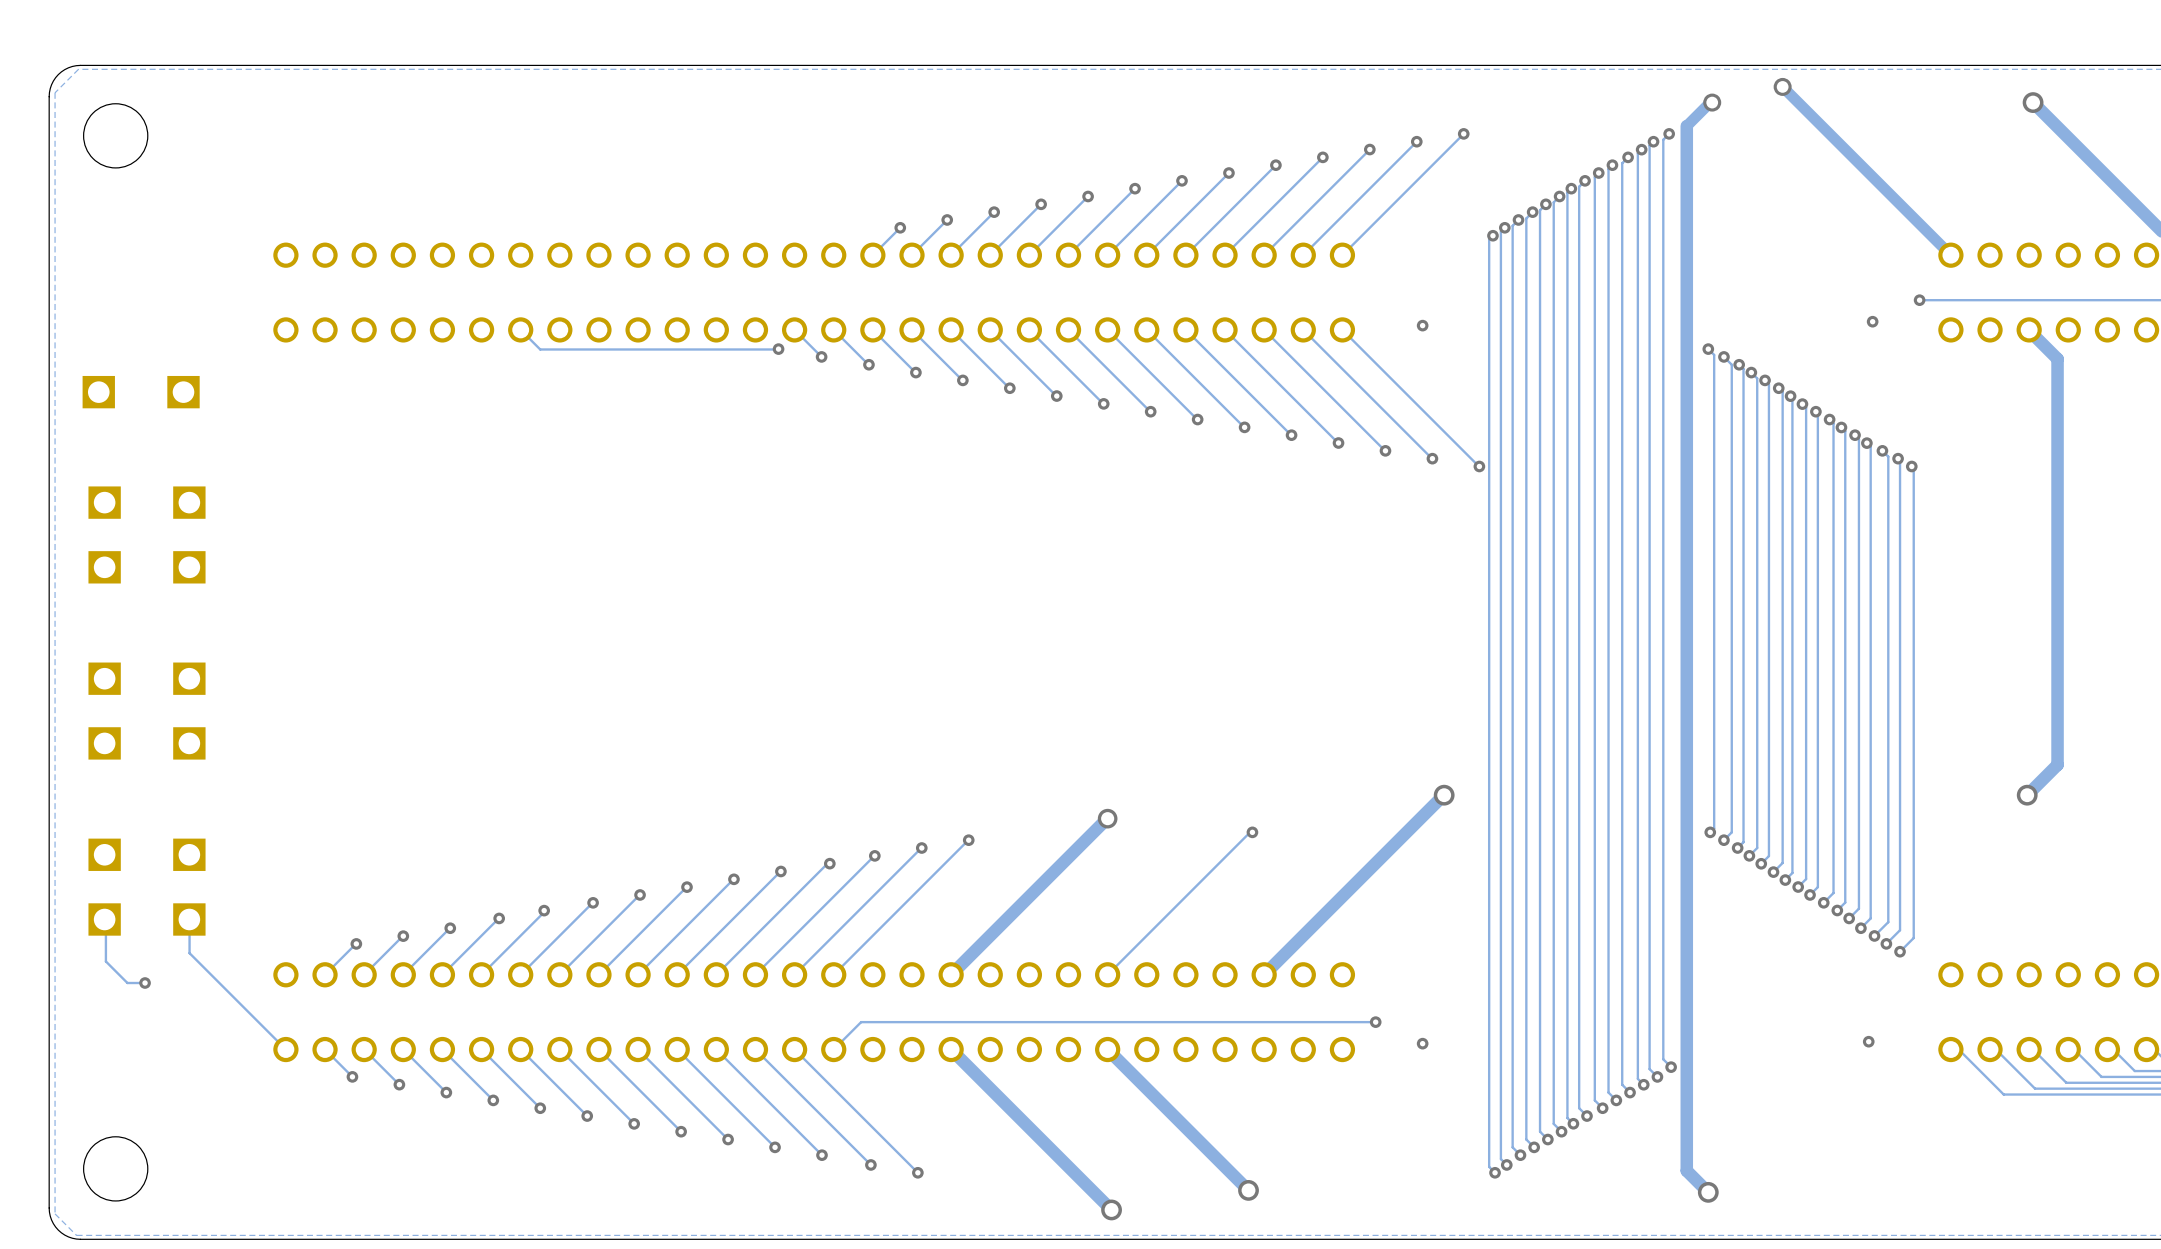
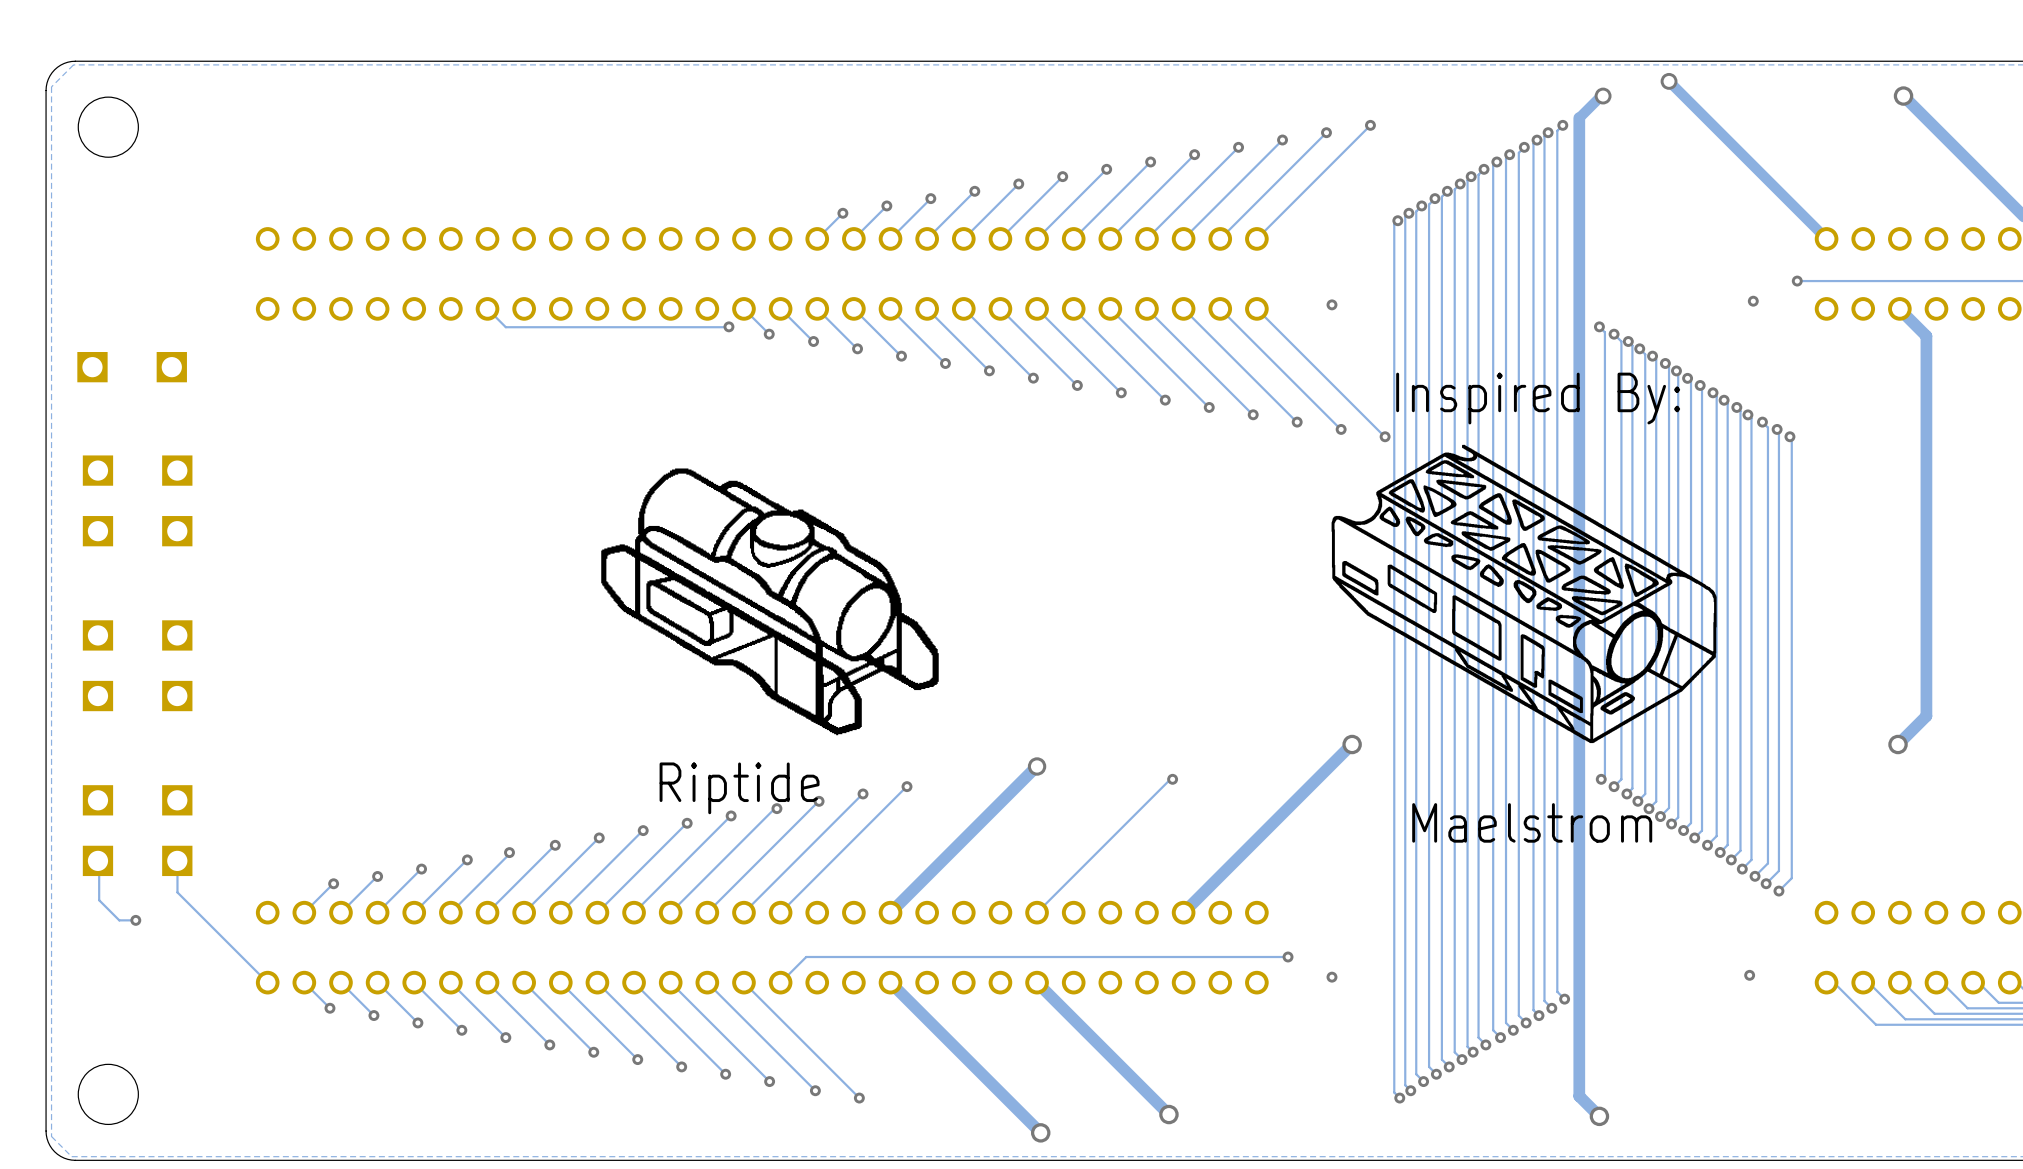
text: none -> Inspired By: (1538, 398)
drawing: none -> [1331, 444, 1717, 744]
drawing: none -> [601, 468, 939, 736]
text: none -> Riptide (739, 788)
text: none -> Maelstrom (1532, 822)

